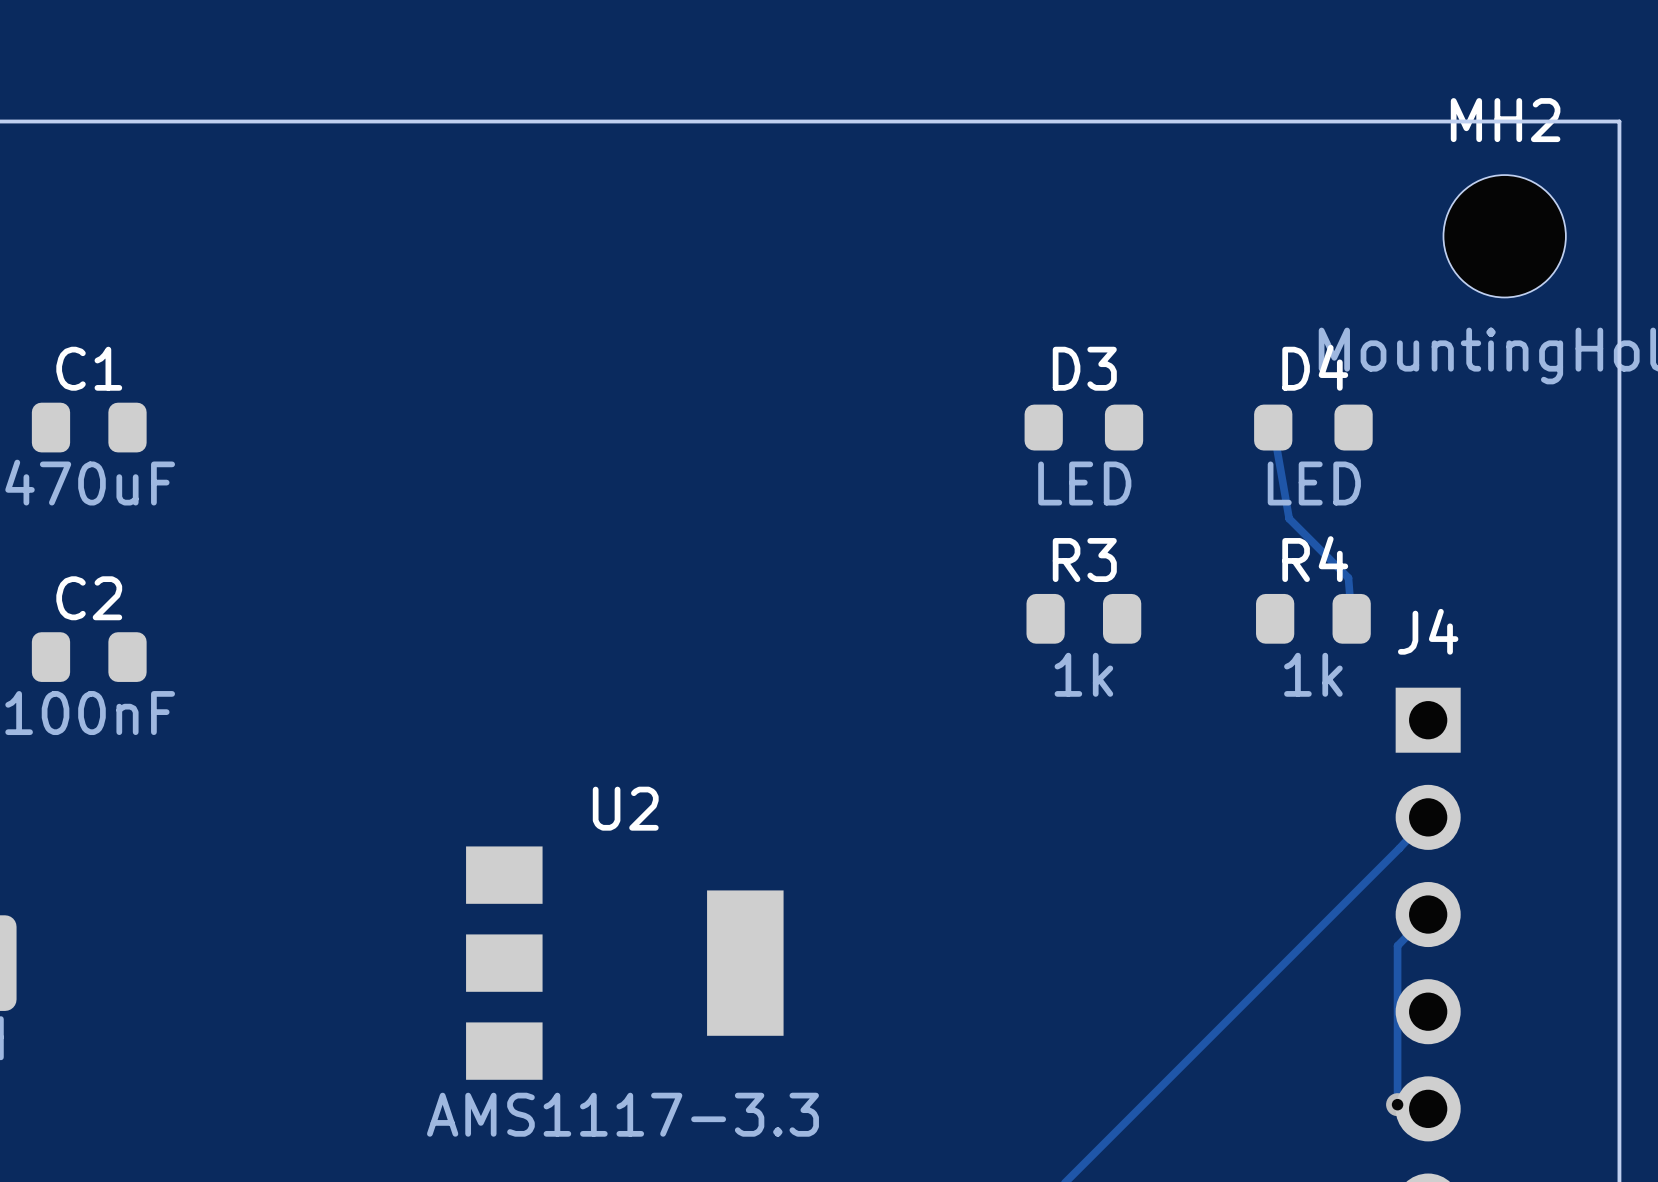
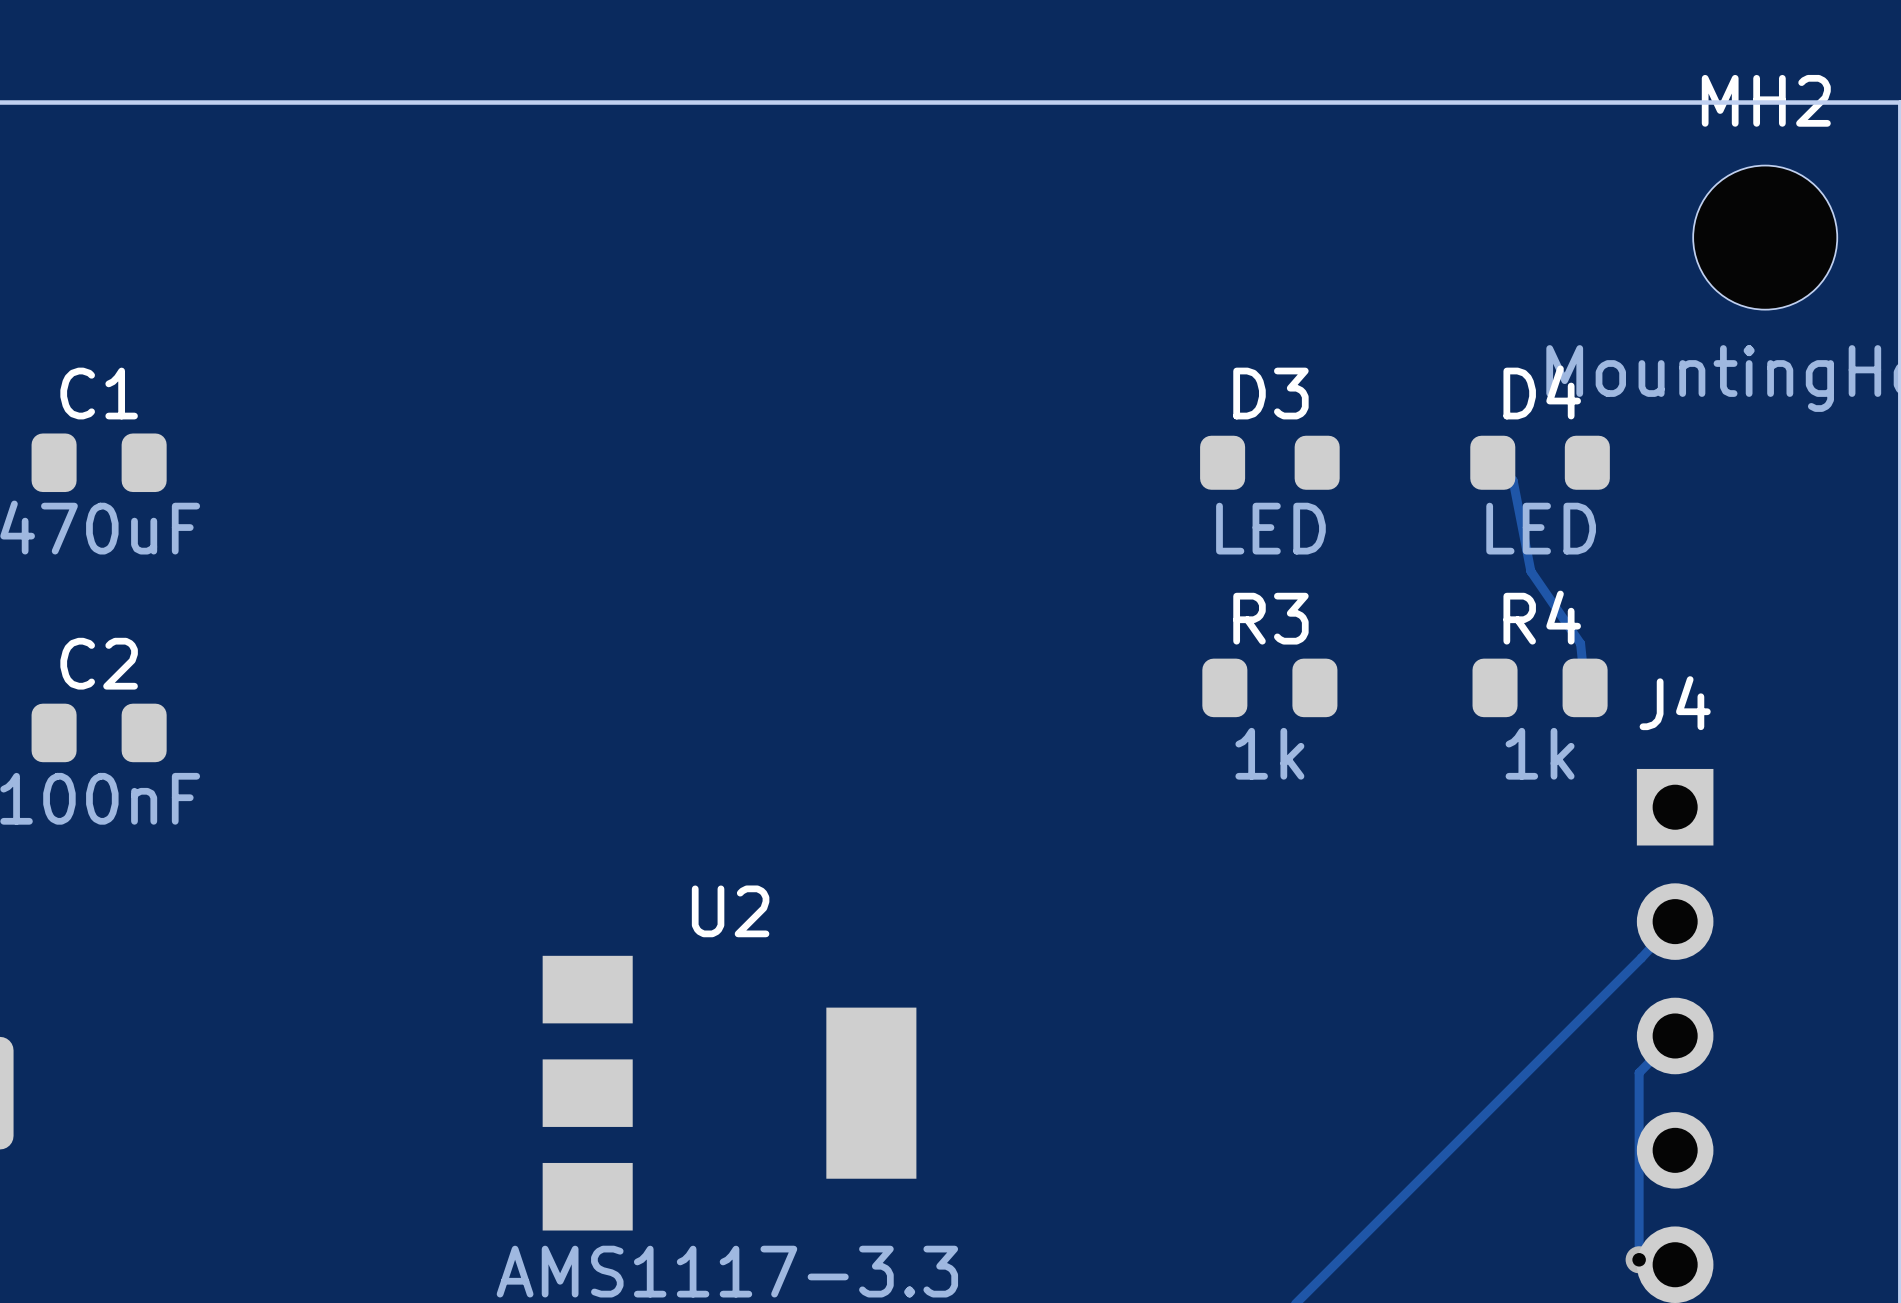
track: (1273, 427) (1289, 518) (1348, 578) (1351, 618) -> (1492, 462) (1513, 480) (1530, 571) (1580, 643) (1585, 687)

